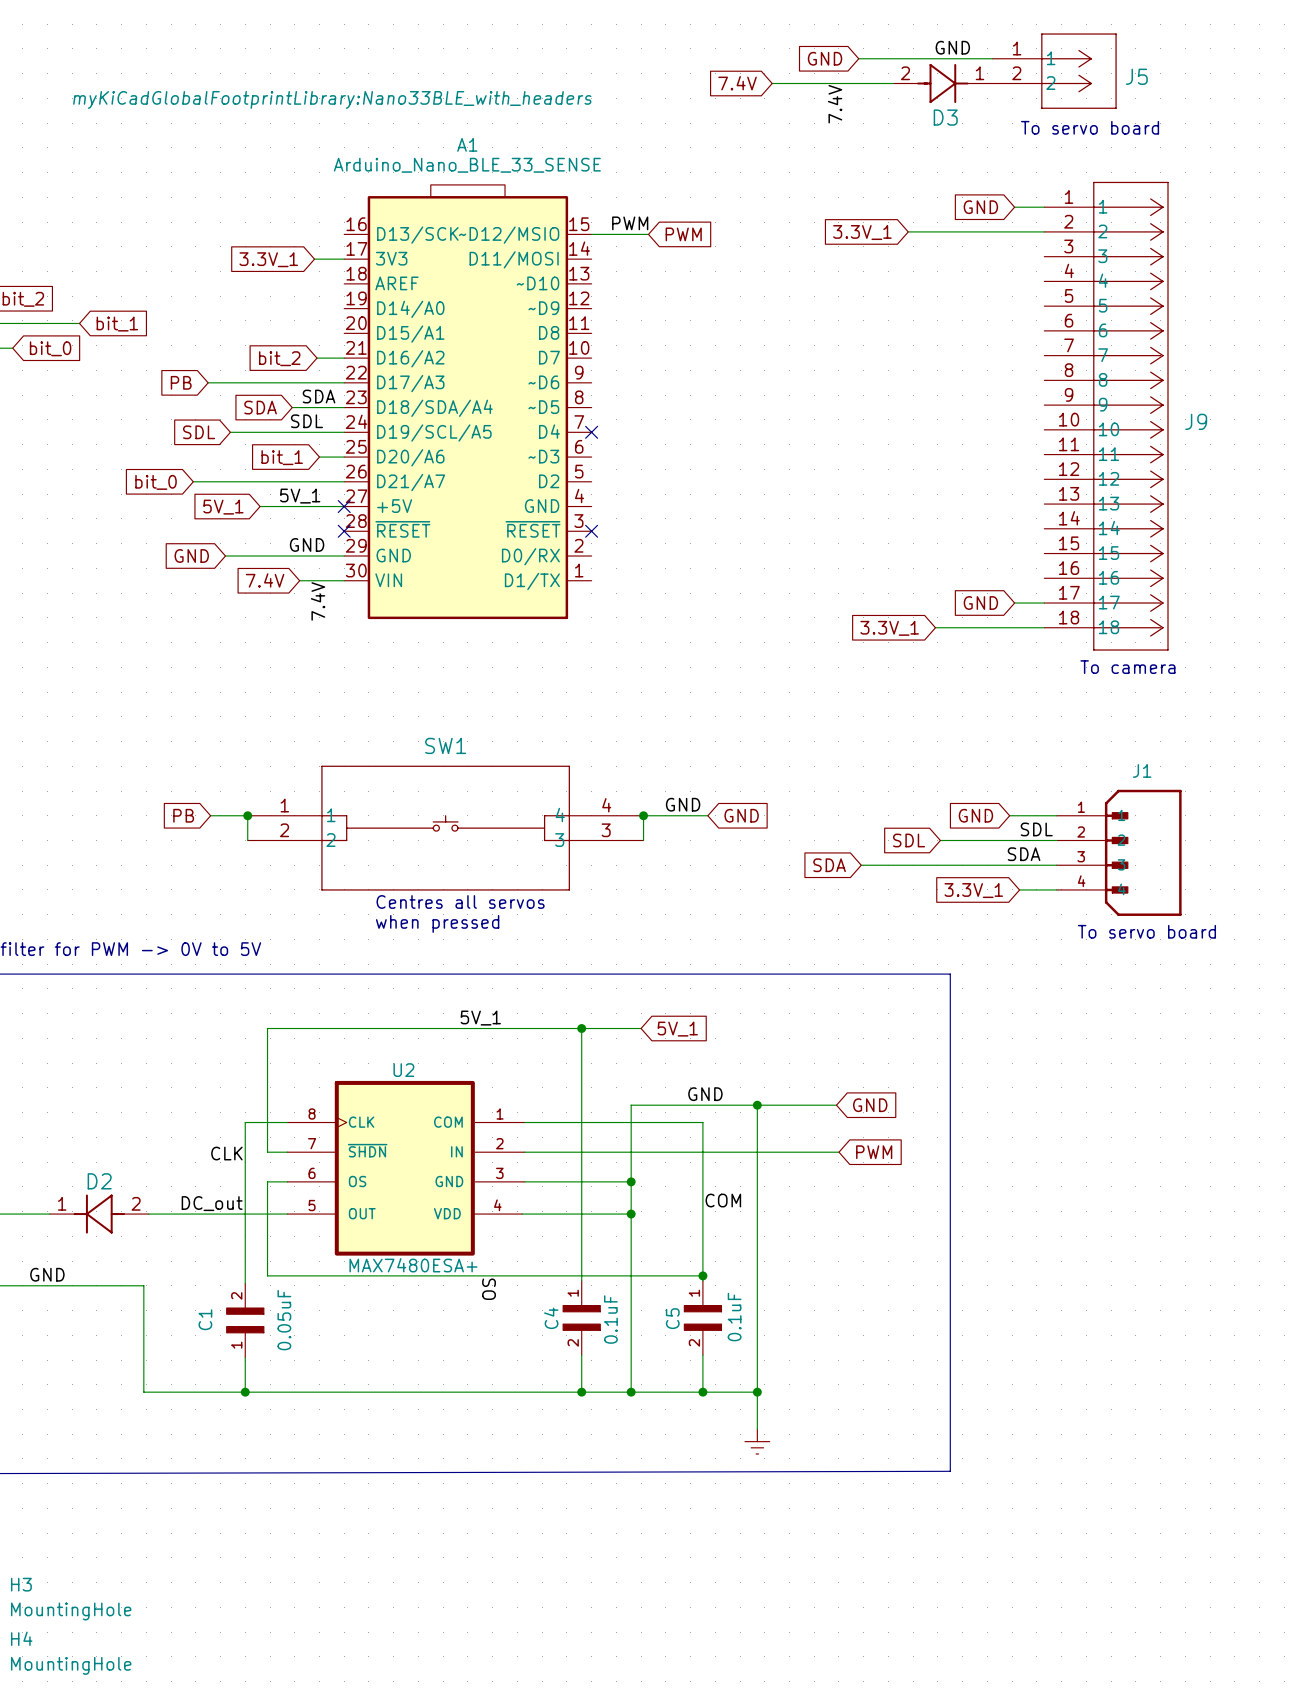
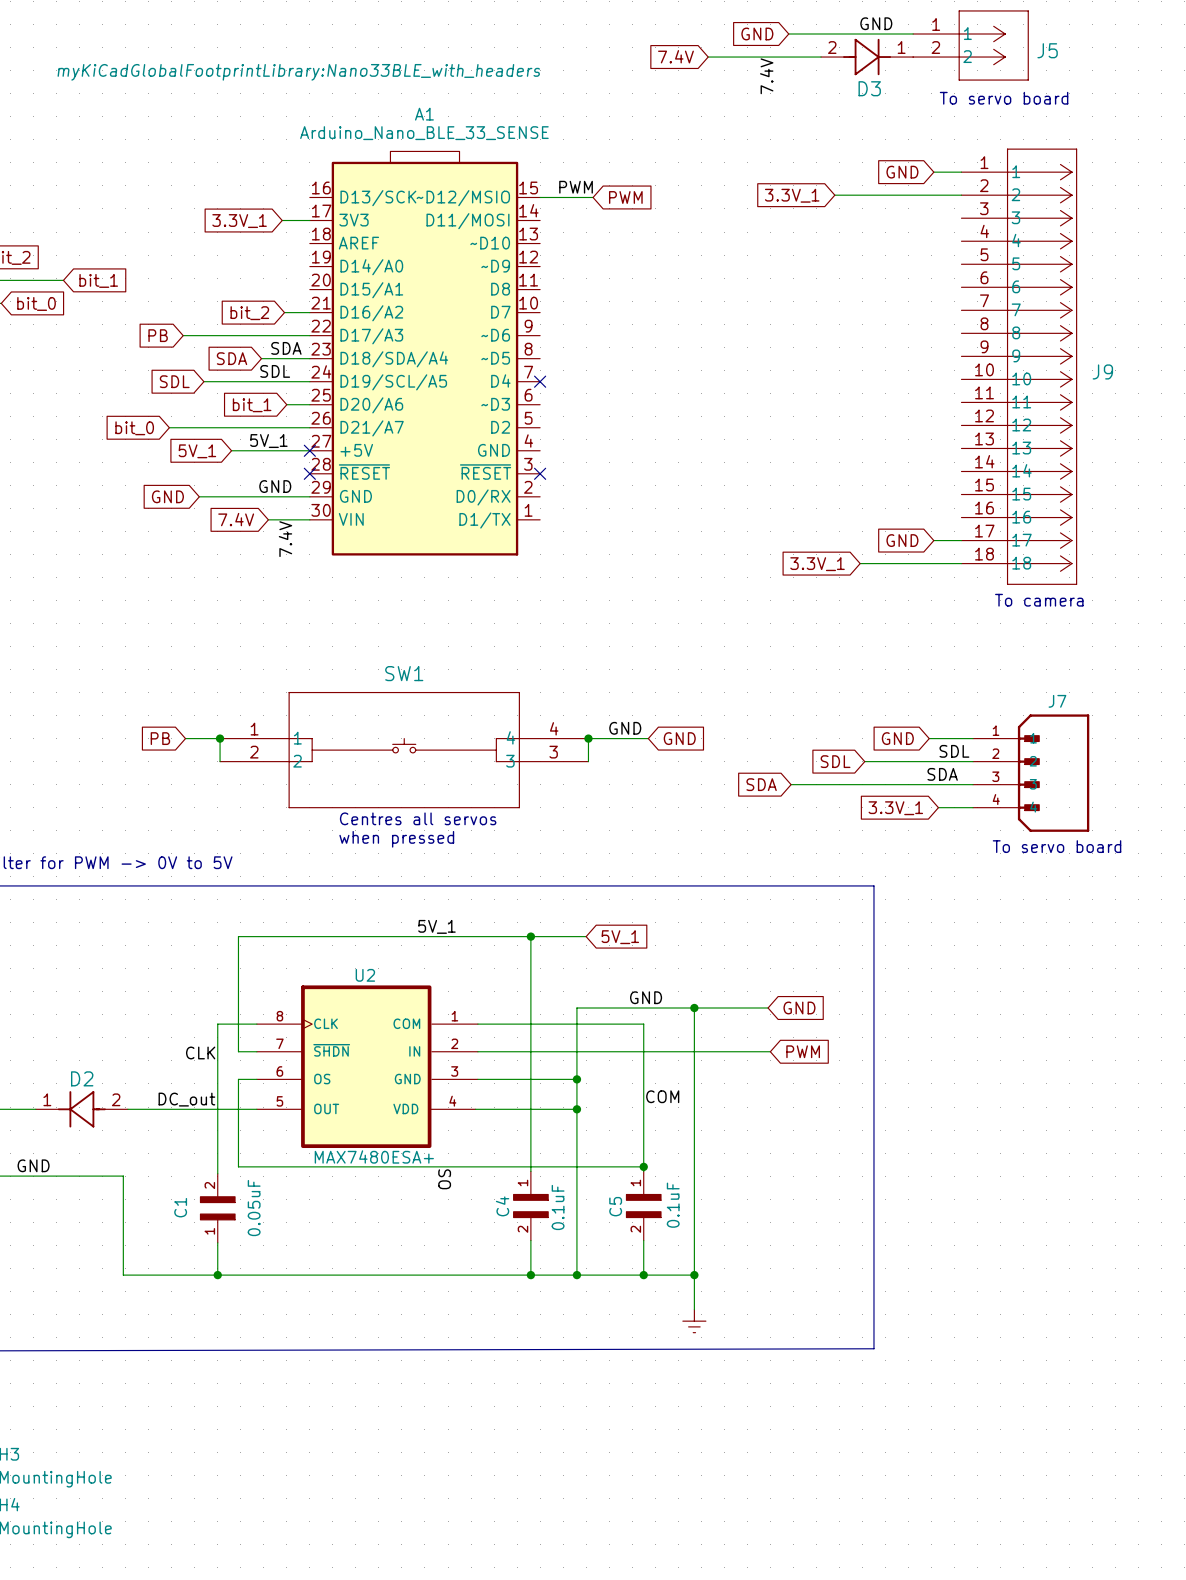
J1 name: J1 (1142, 770) -> J7 (1057, 701)

